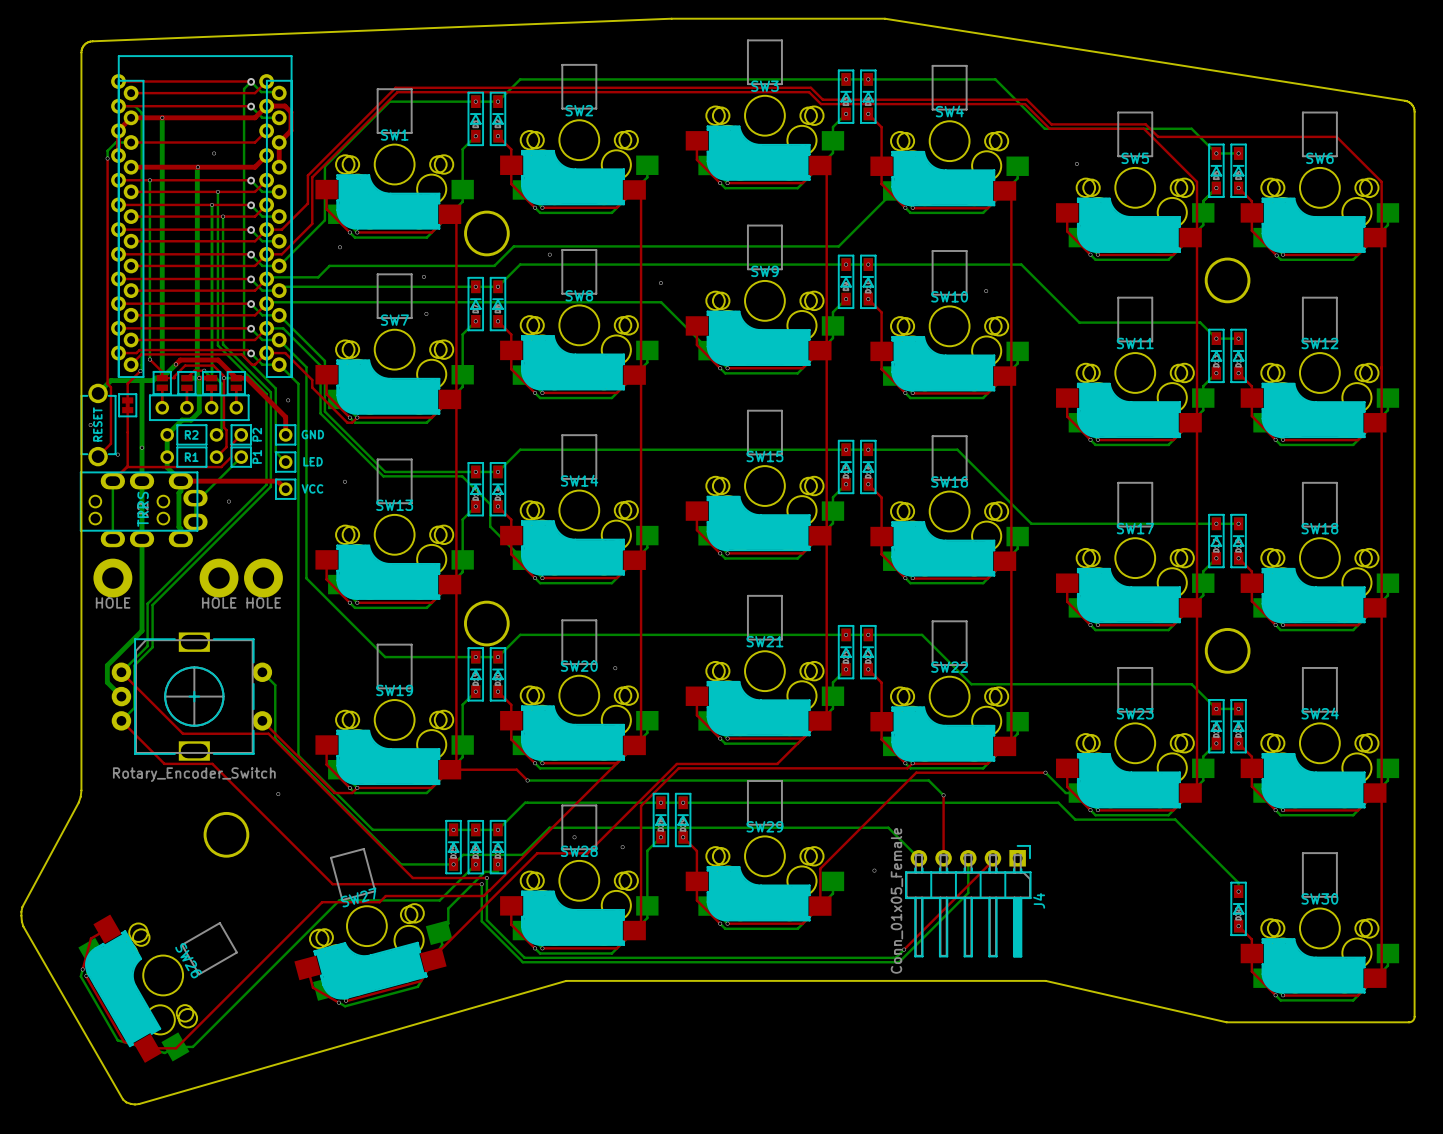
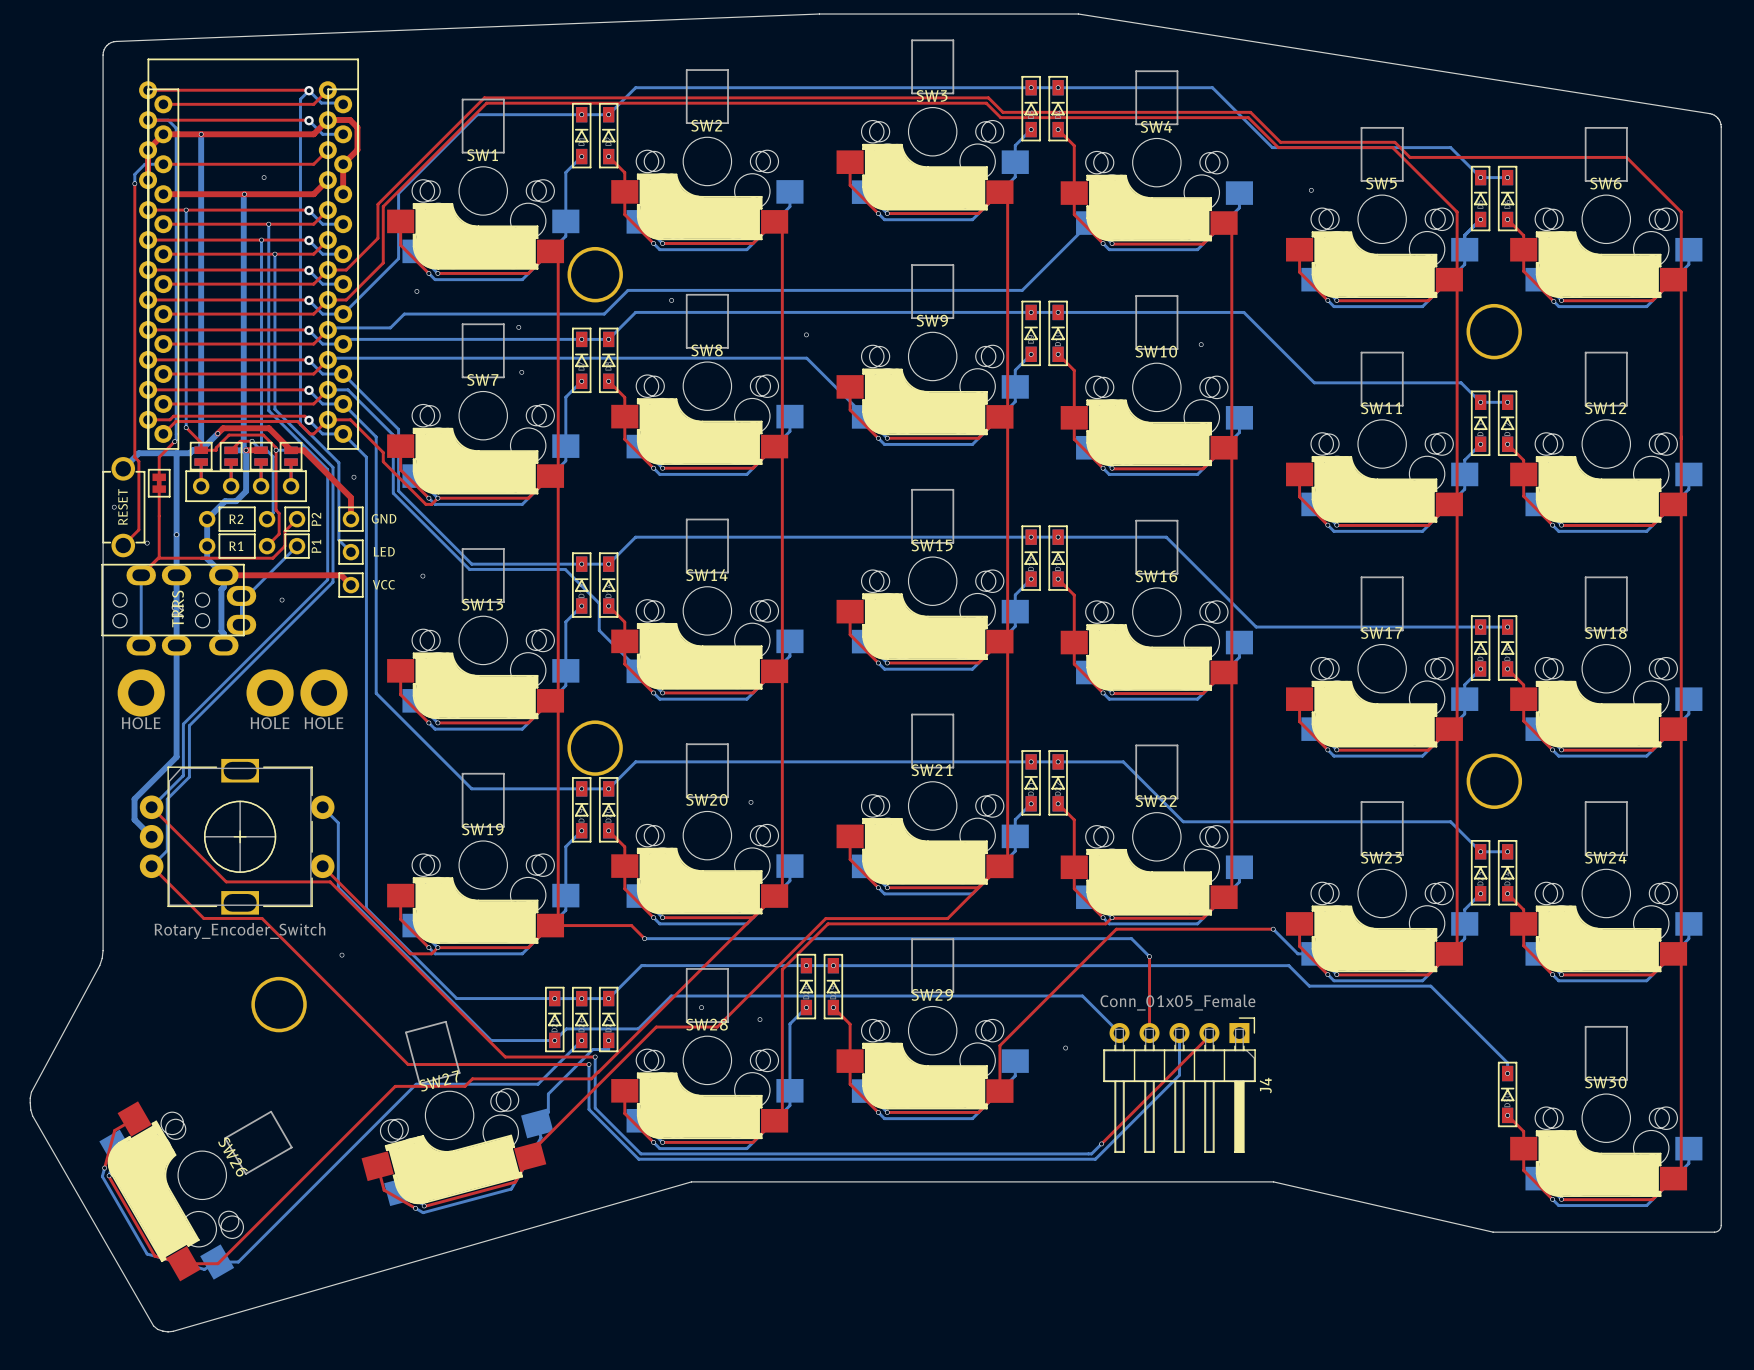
J4 value rotation: 0° (896, 900) -> 90° clockwise (1177, 1002)

